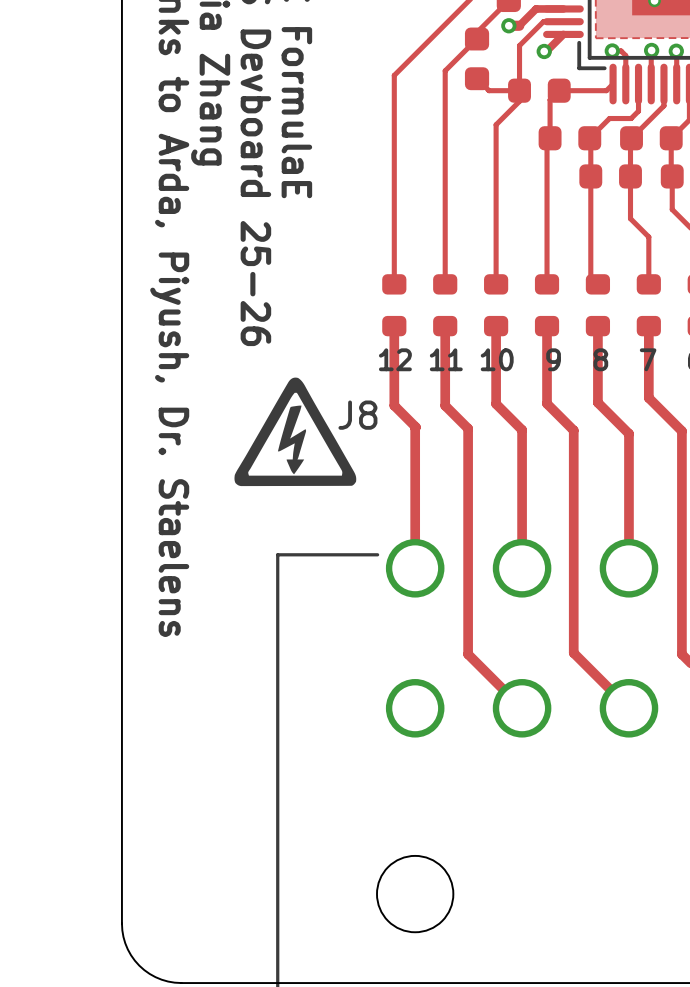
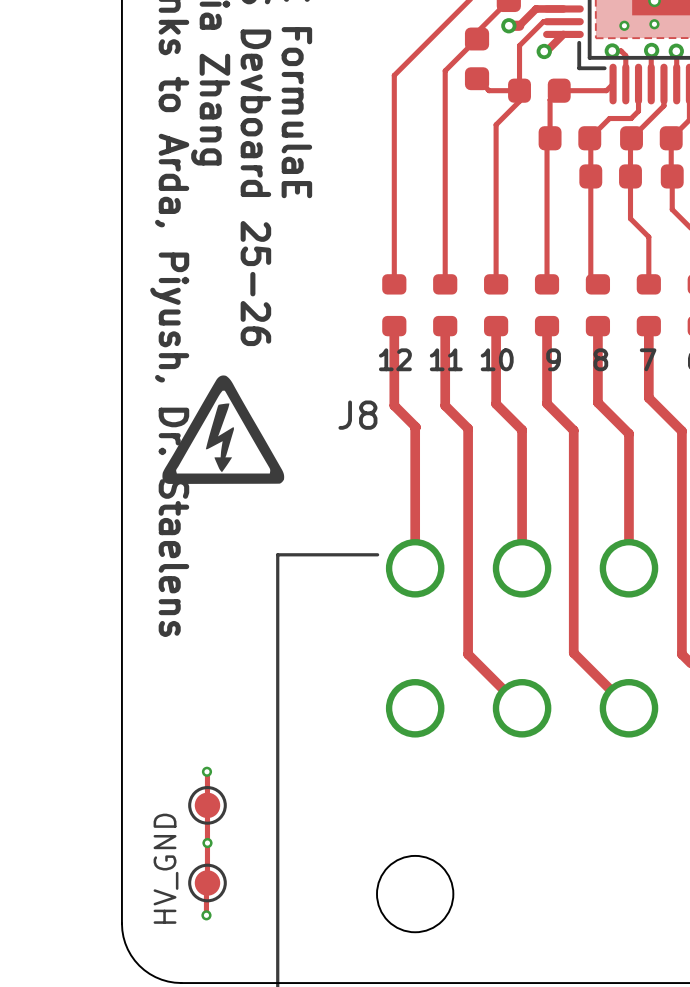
via: none -> (654, 24)
via: none -> (624, 25)
drawing position: (295, 431) -> (223, 429)
drawing position: (291, 439) -> (219, 437)
track: none -> (206, 771) (206, 915)
via: none -> (206, 771)
part: none -> (207, 805)
via: none -> (207, 843)
text: none -> HV_GND (166, 868)
part: none -> (207, 883)
via: none -> (206, 915)

